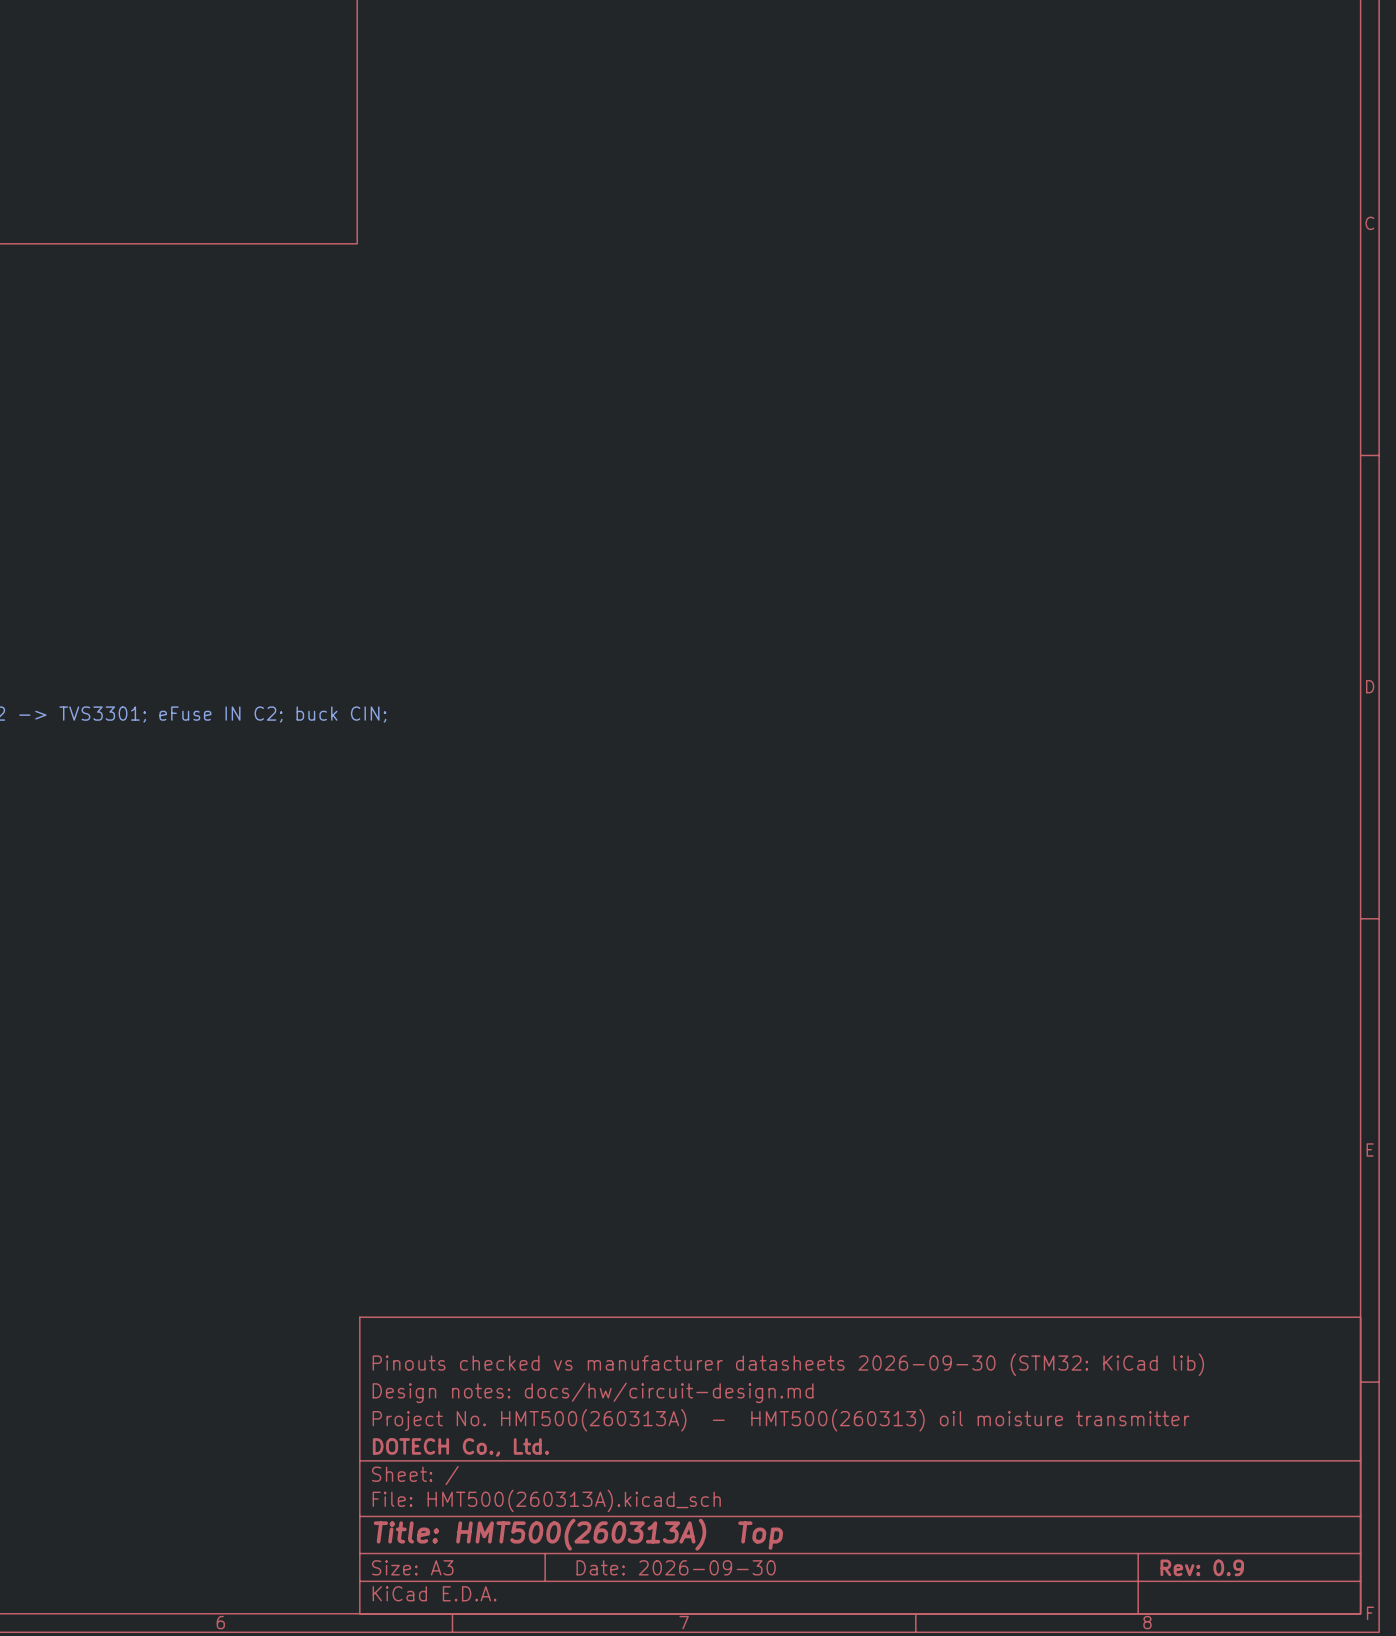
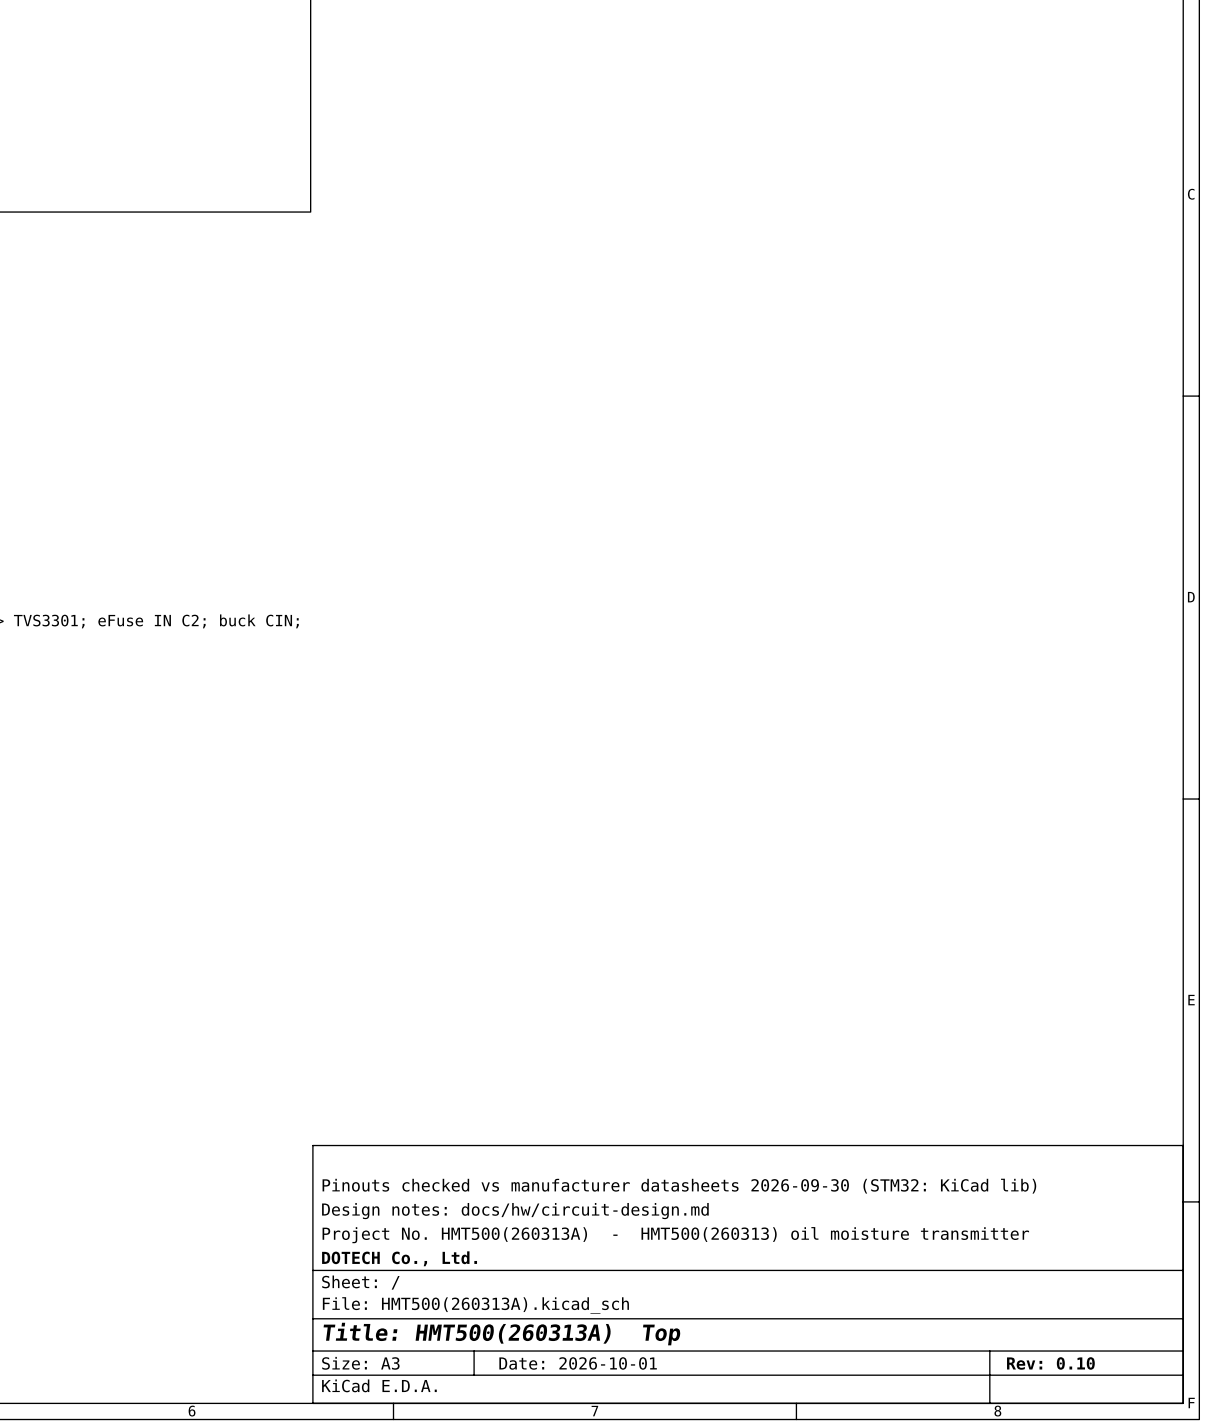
title block: Date: 2026-09-30 (676, 1567) -> Date: 2026-10-01 (578, 1363)
title block: Rev: 0.9 (1202, 1567) -> Rev: 0.10 (1050, 1363)

